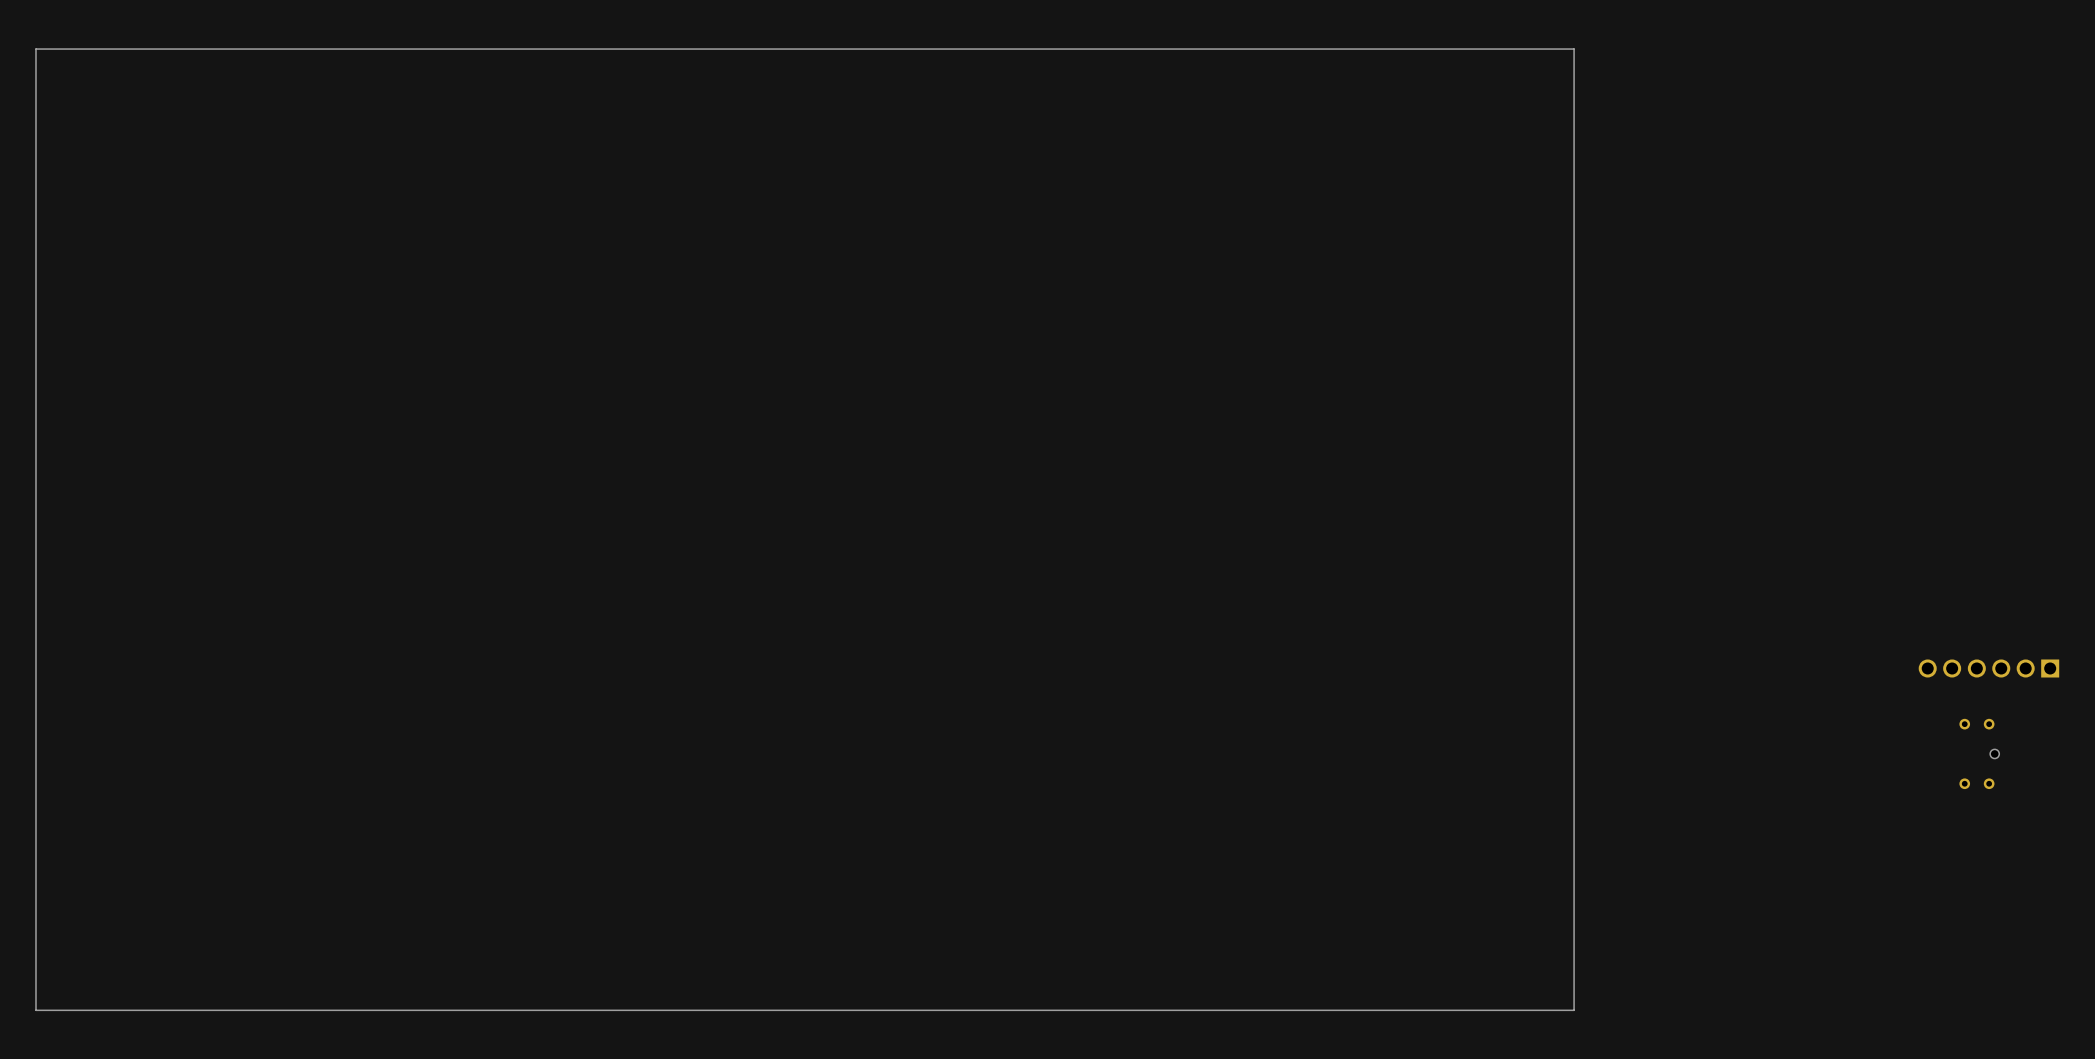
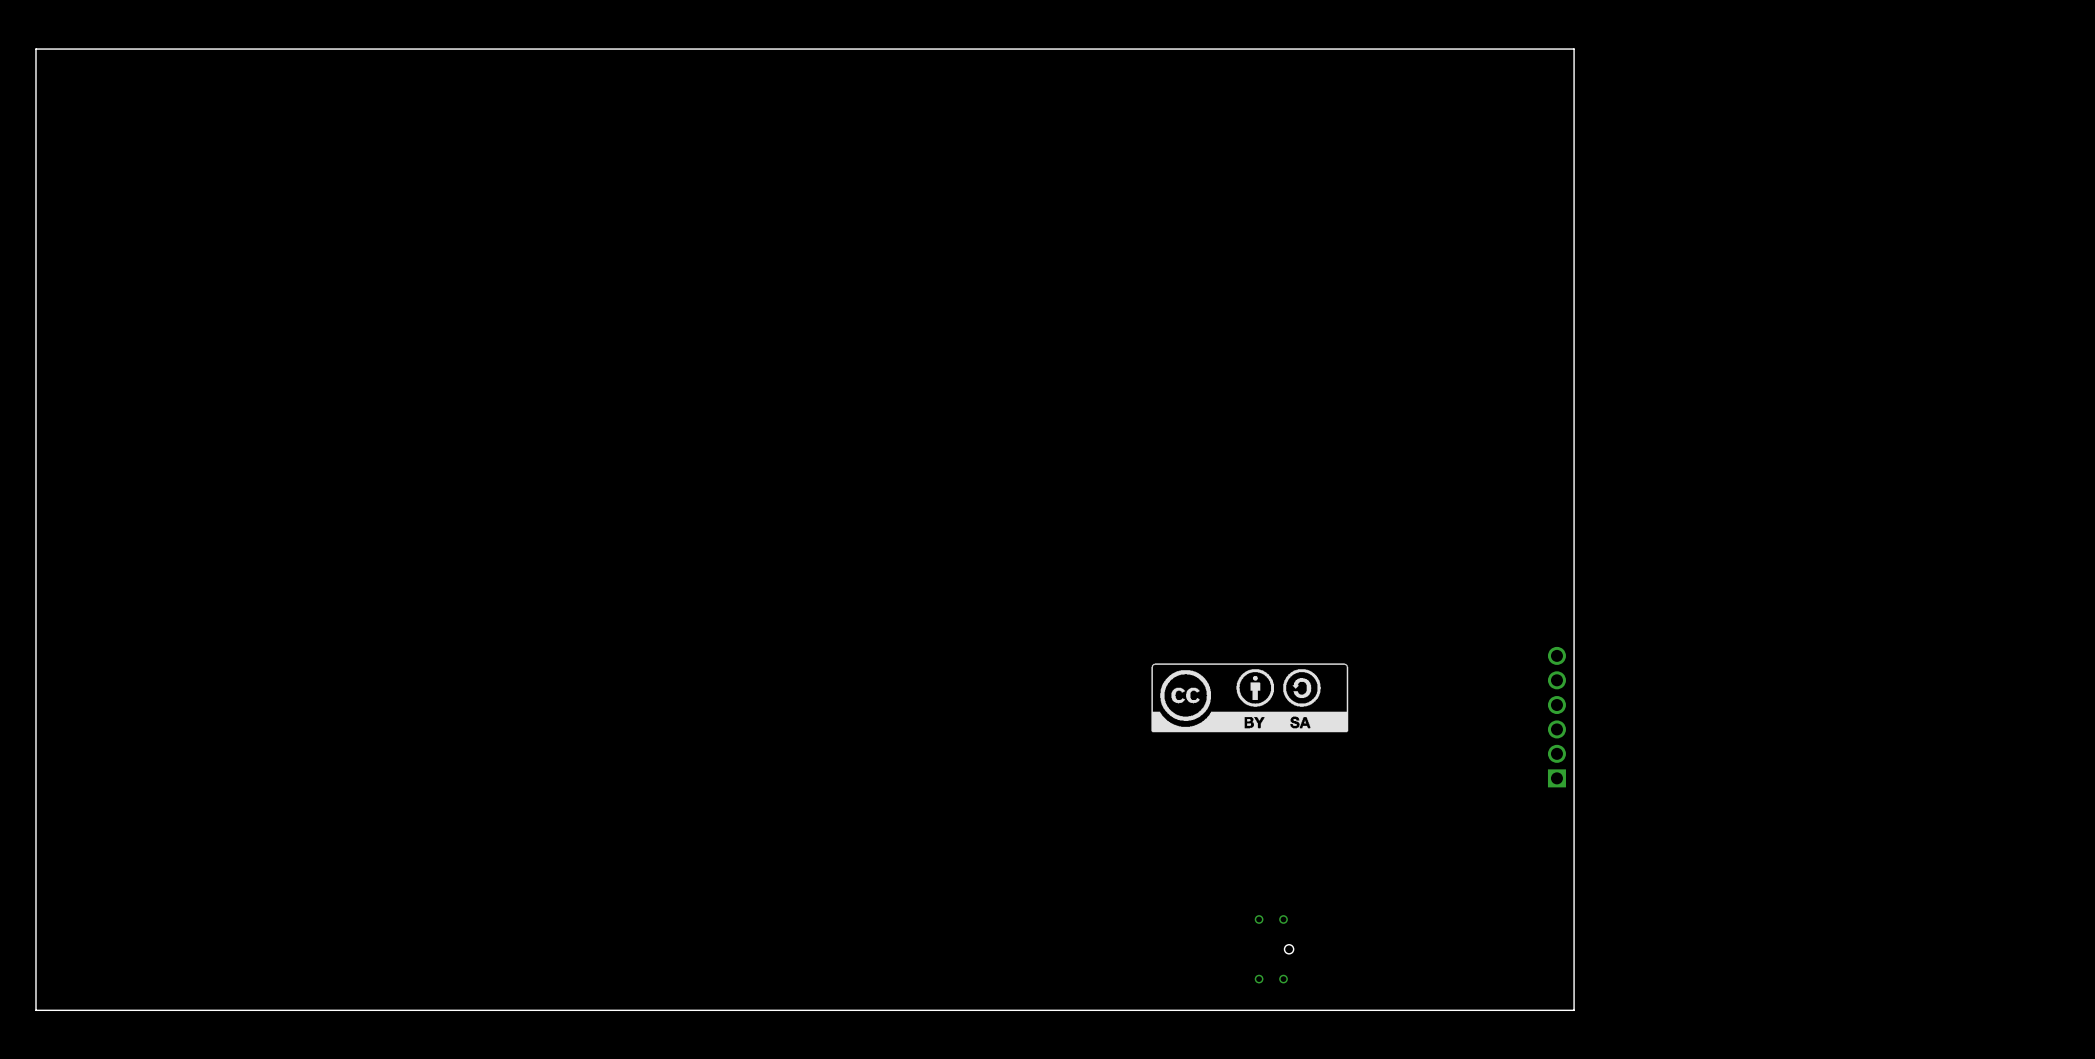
drawing: none -> [1151, 663, 1349, 733]
part: (1988, 668) -> none
part: none -> (1556, 717)
part: (1979, 753) -> none
part: none -> (1274, 949)

